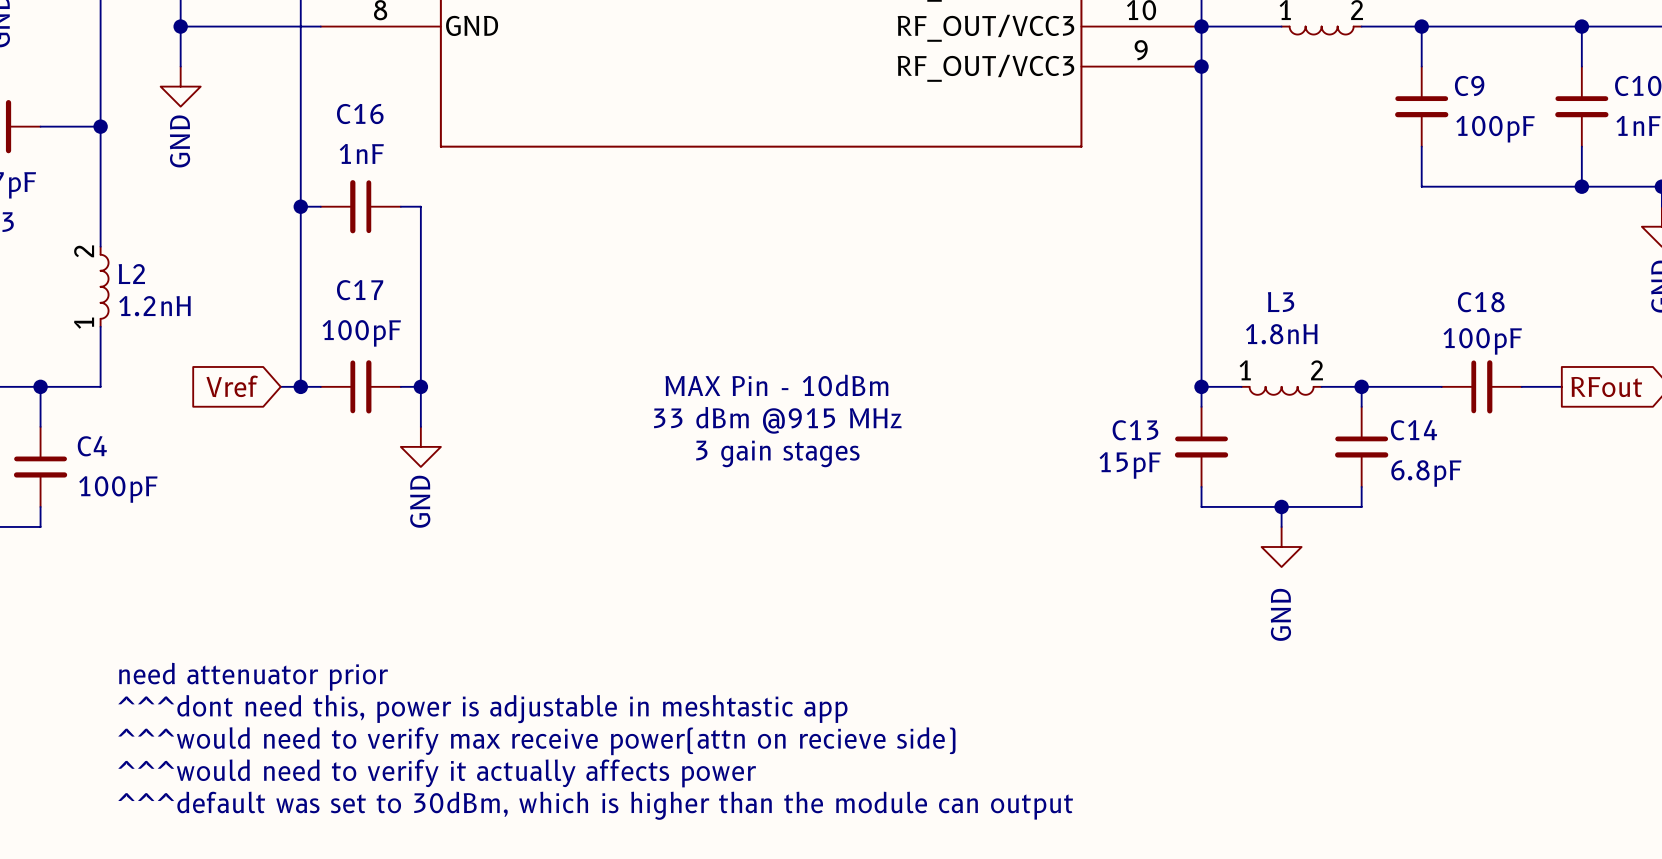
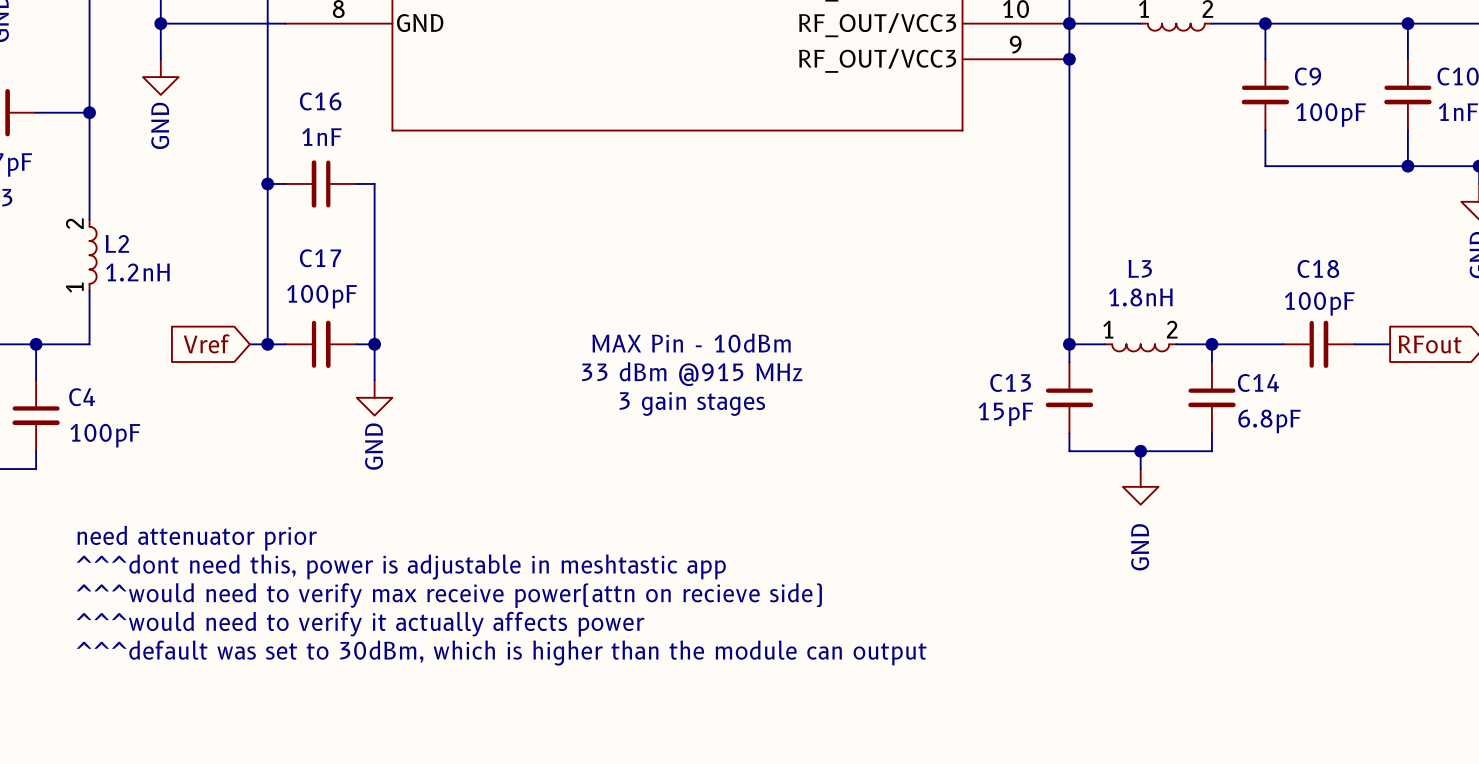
text position: need attenuator prior (253, 676) -> need attenuator prior (197, 538)
text position: ^^^dont need this, power is adjustable in meshtastic app (482, 709) -> ^^^dont need this, power is adjustable in meshtastic app (401, 566)
text position: ^^^would need to verify max receive power(attn on recieve side) (536, 741) -> ^^^would need to verify max receive power(attn on recieve side) (449, 595)
text position: ^^^would need to verify it actually affects power (437, 773) -> ^^^would need to verify it actually affects power (360, 624)
text position: ^^^default was set to 30dBm, which is higher than the module can output (595, 805) -> ^^^default was set to 30dBm, which is higher than the module can output (501, 653)

